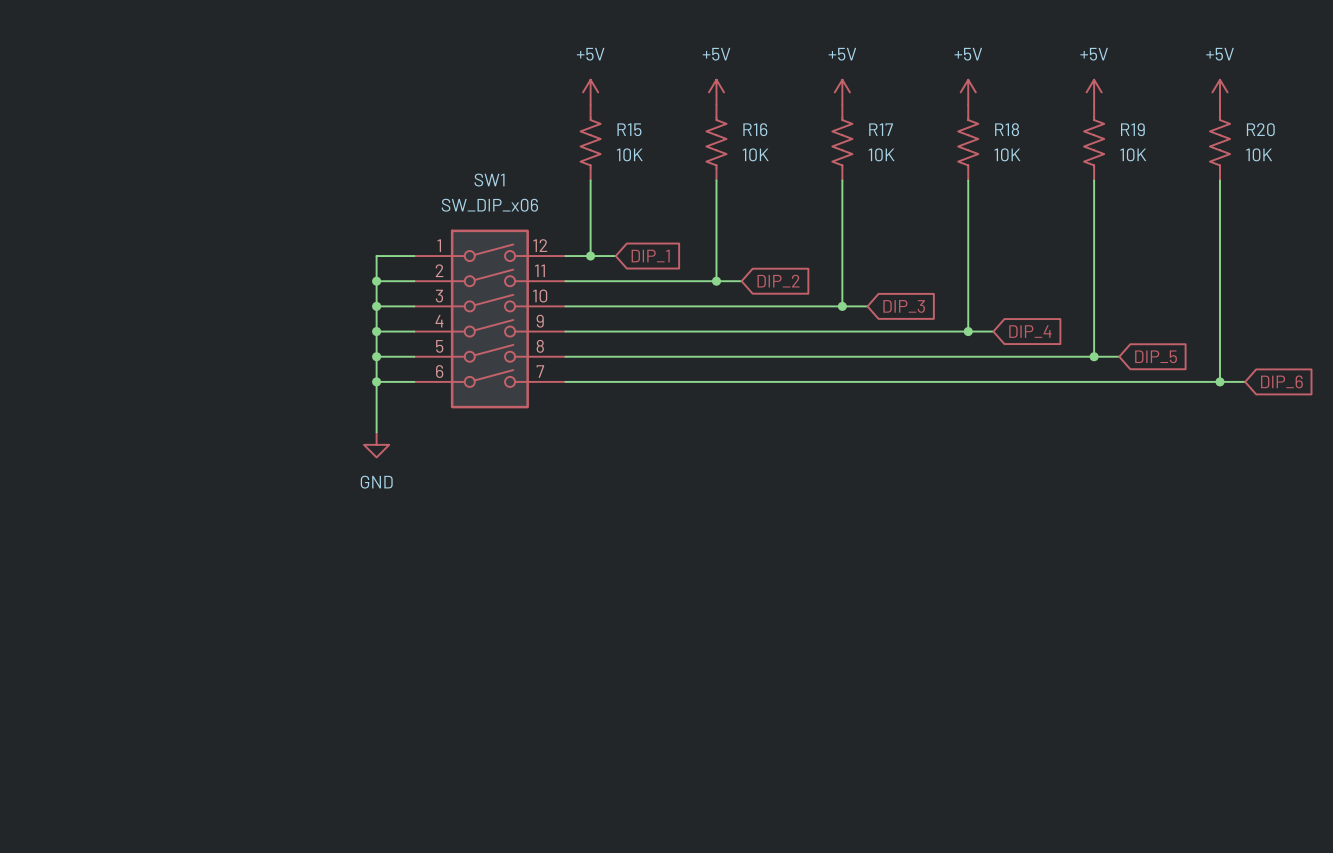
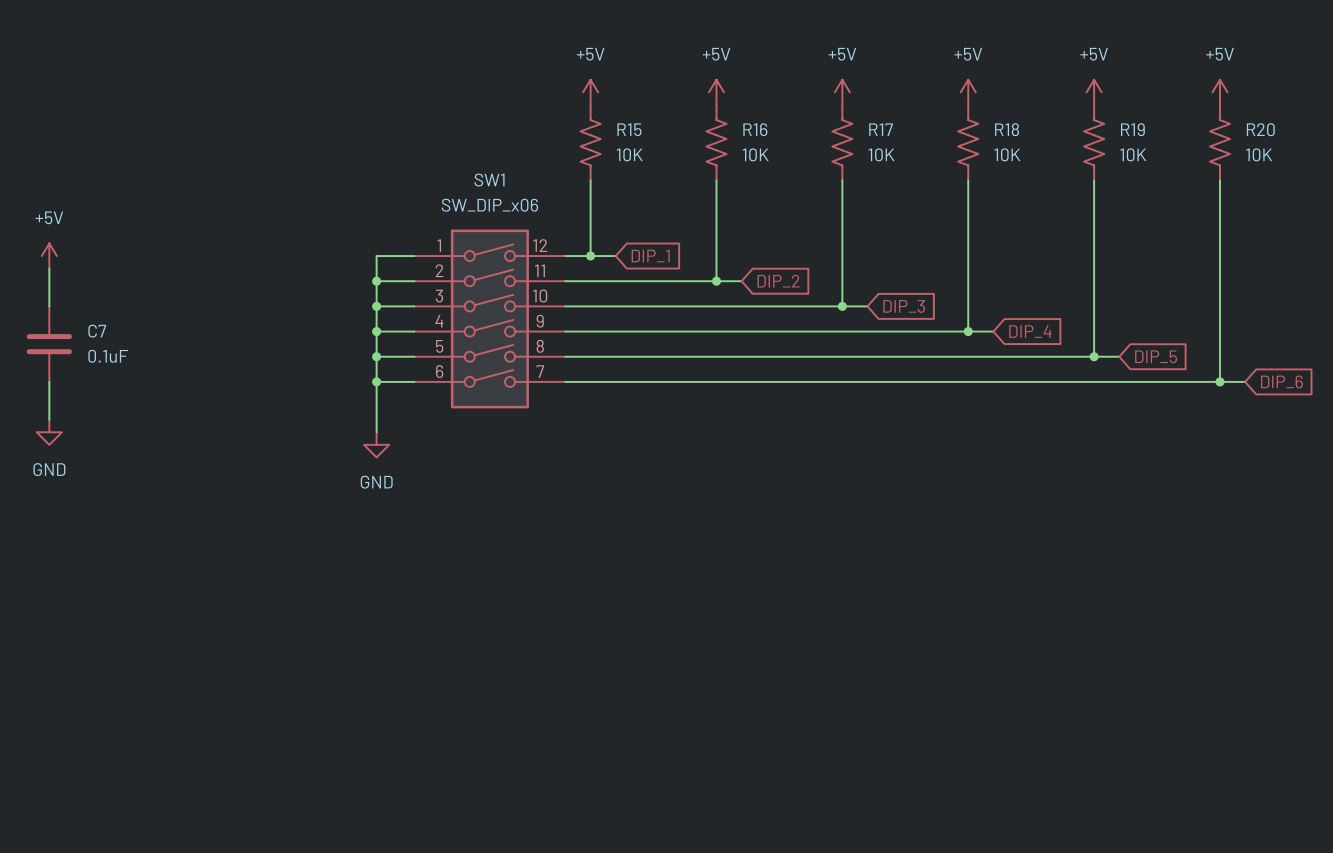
power symbol: none -> +5V (49, 256)
wire: none -> (49, 268) (49, 306)
C7: none -> 0.1uF (49, 344)
wire: none -> (49, 381) (49, 419)
power symbol: none -> GND (49, 432)

